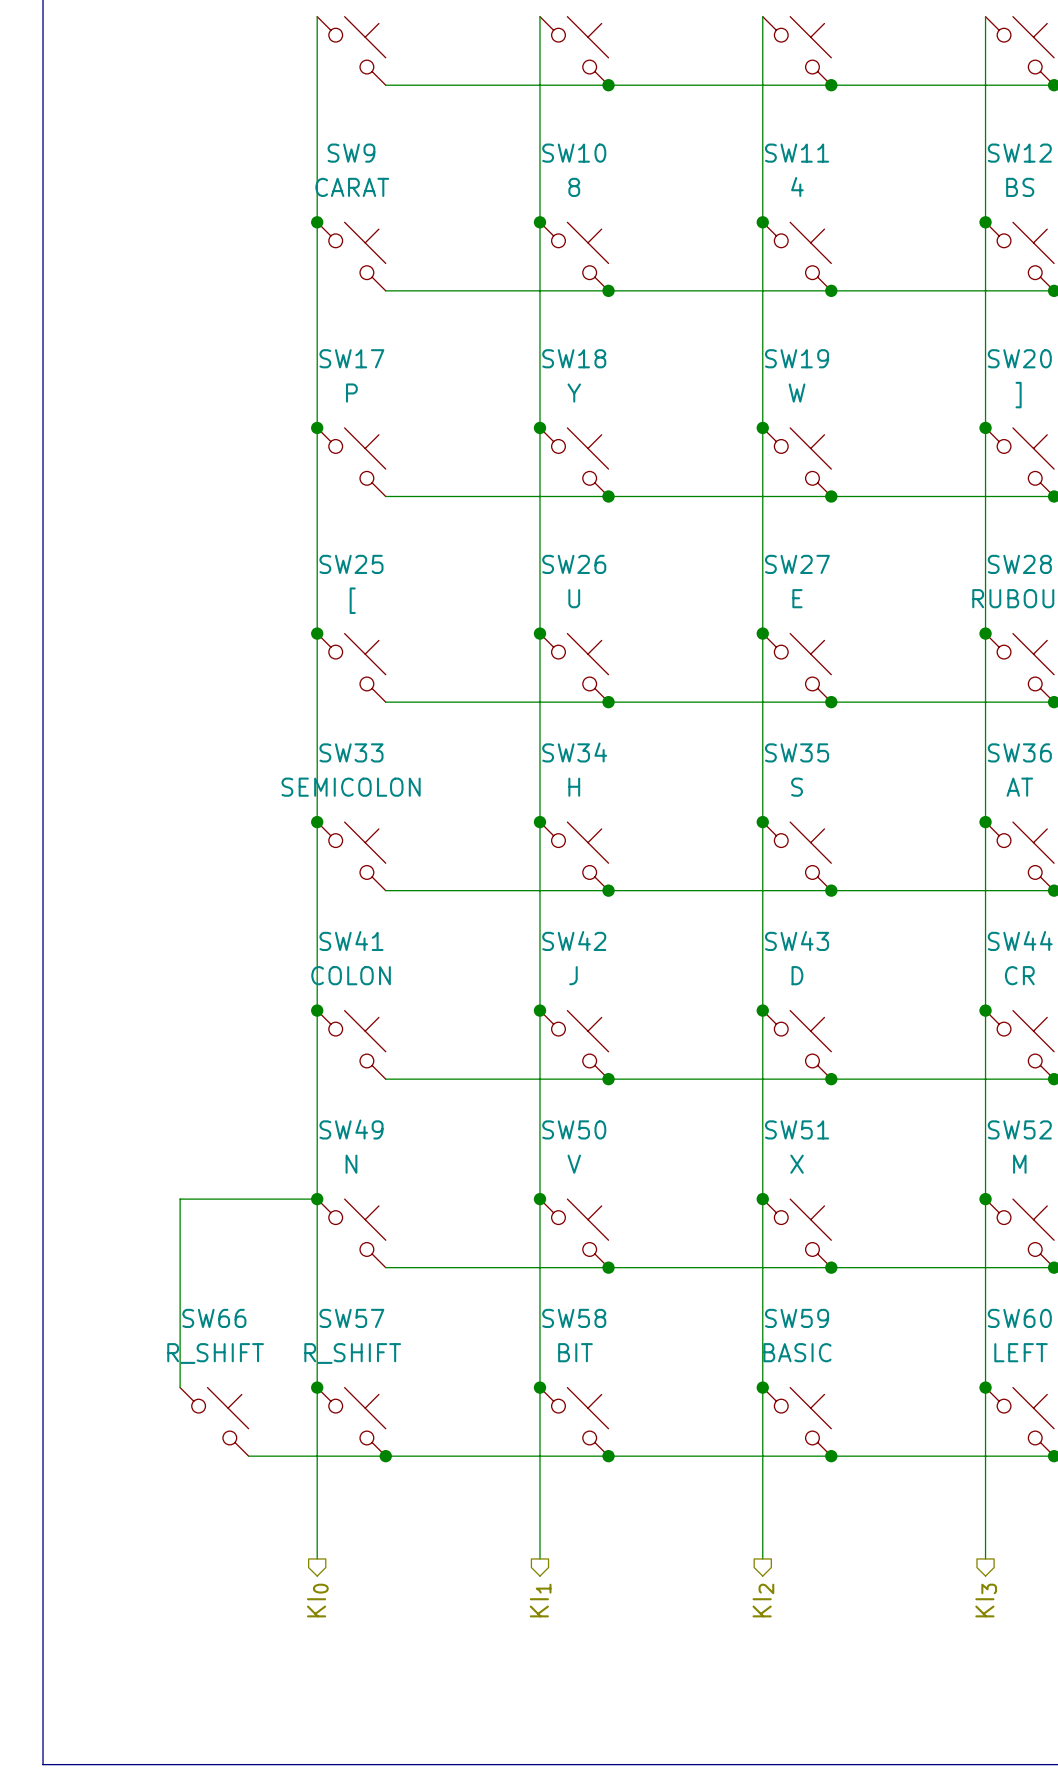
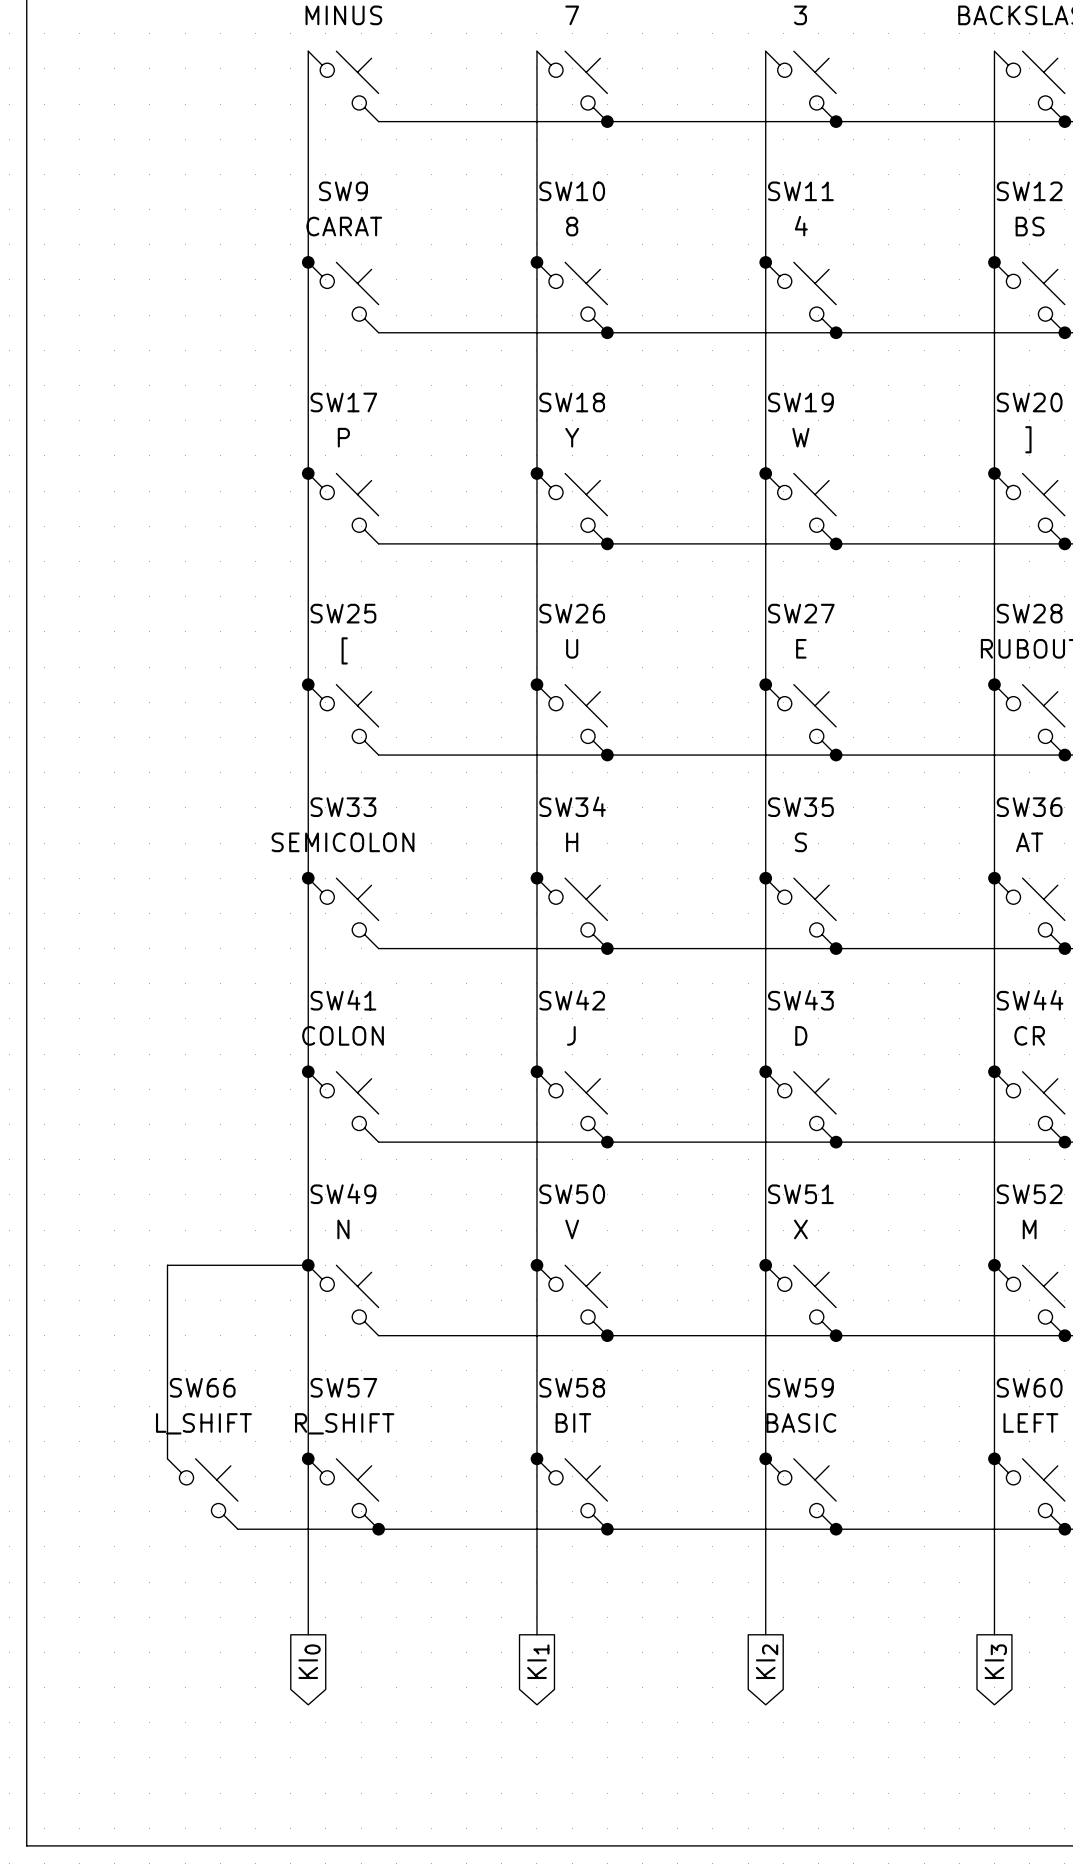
SW66 value: R_SHIFT (215, 1353) -> L_SHIFT (203, 1423)
global label: none -> KI0 (309, 1661)
global label: none -> KI1 (538, 1661)
global label: none -> KI2 (767, 1661)
global label: none -> KI3 (995, 1661)
hierarchical label: KI0 (317, 1600) -> none
hierarchical label: KI1 (540, 1600) -> none
hierarchical label: KI2 (763, 1600) -> none
hierarchical label: KI3 (986, 1600) -> none

